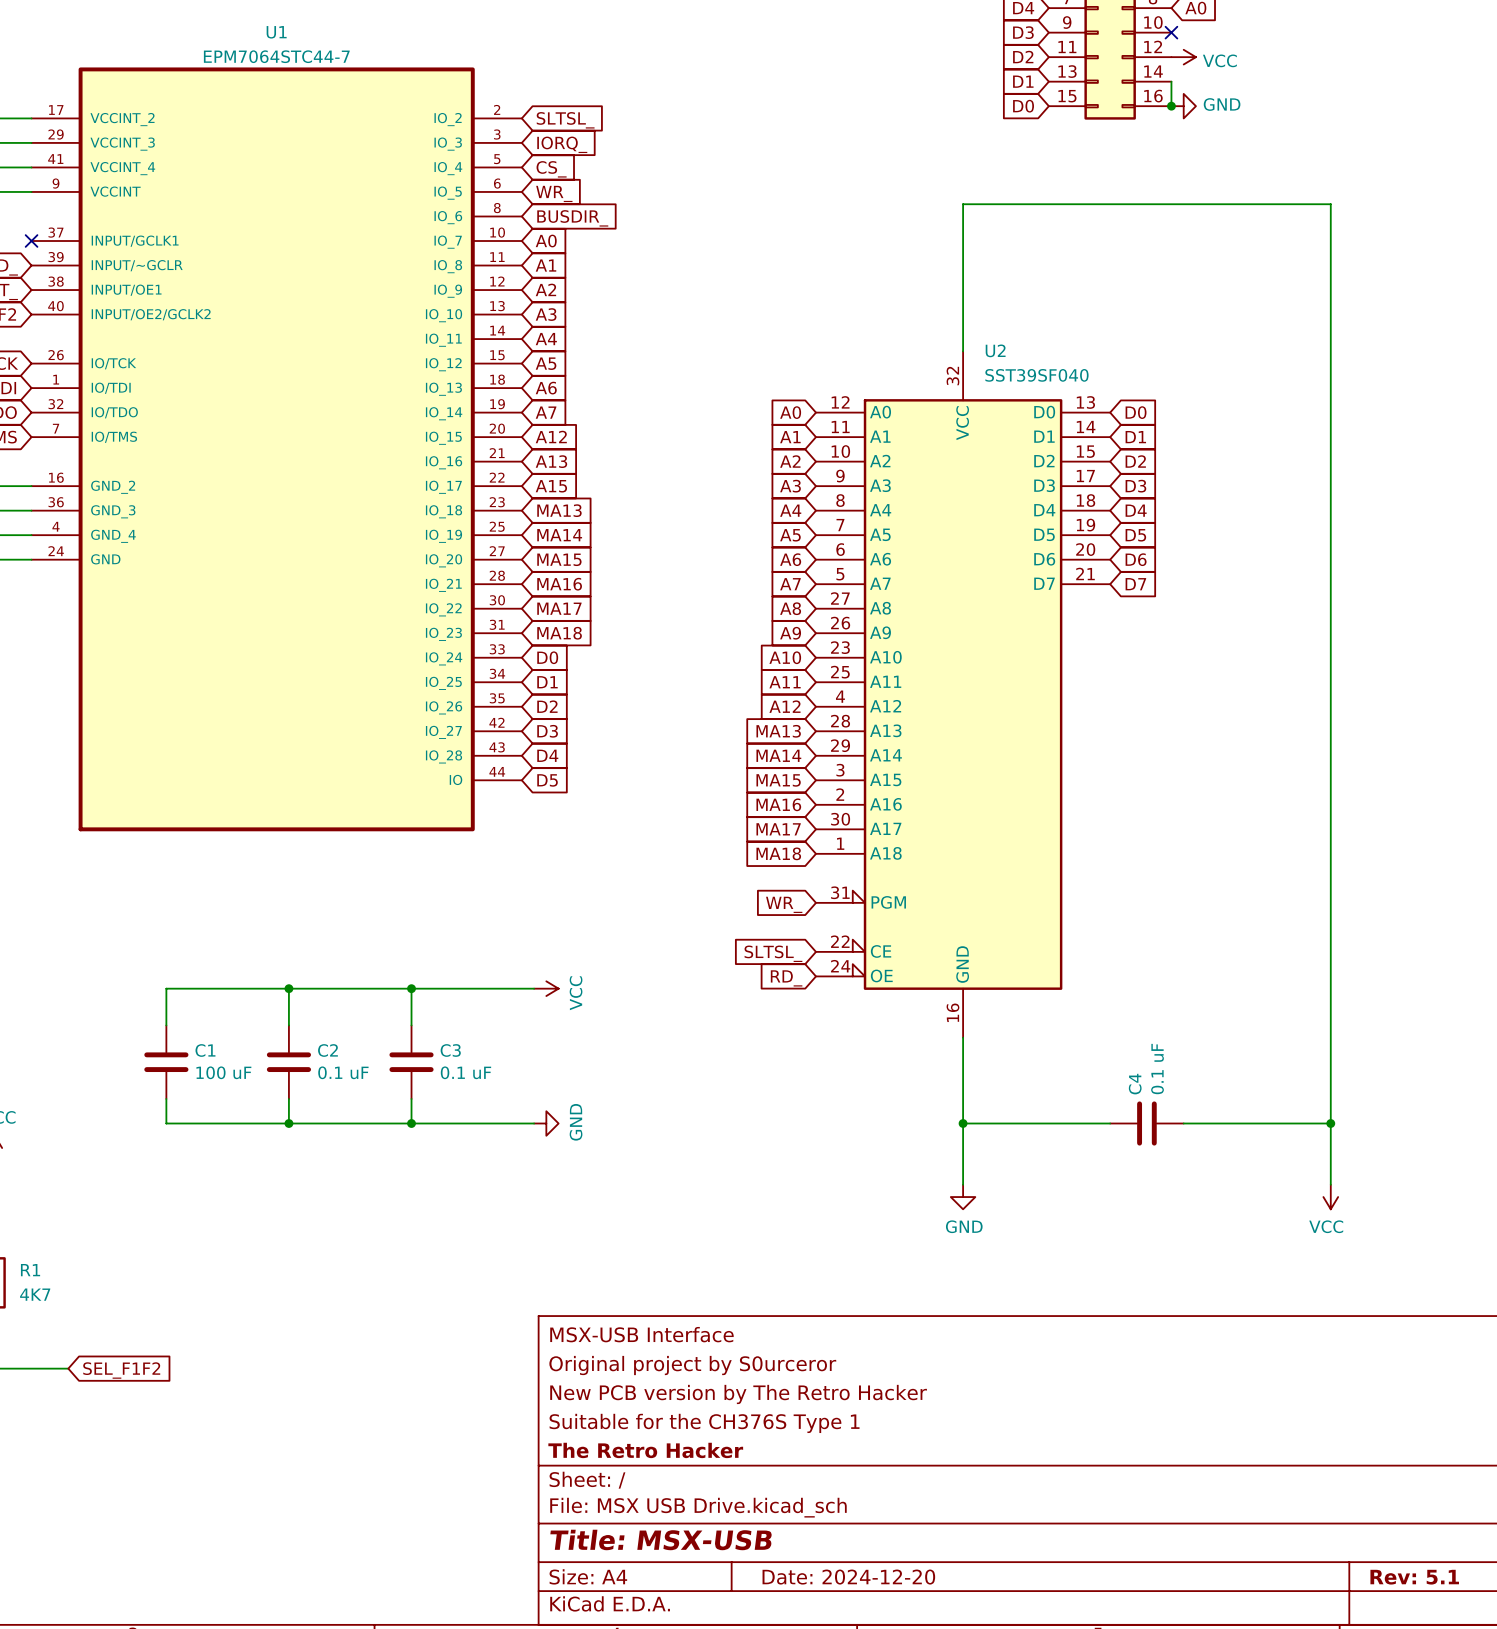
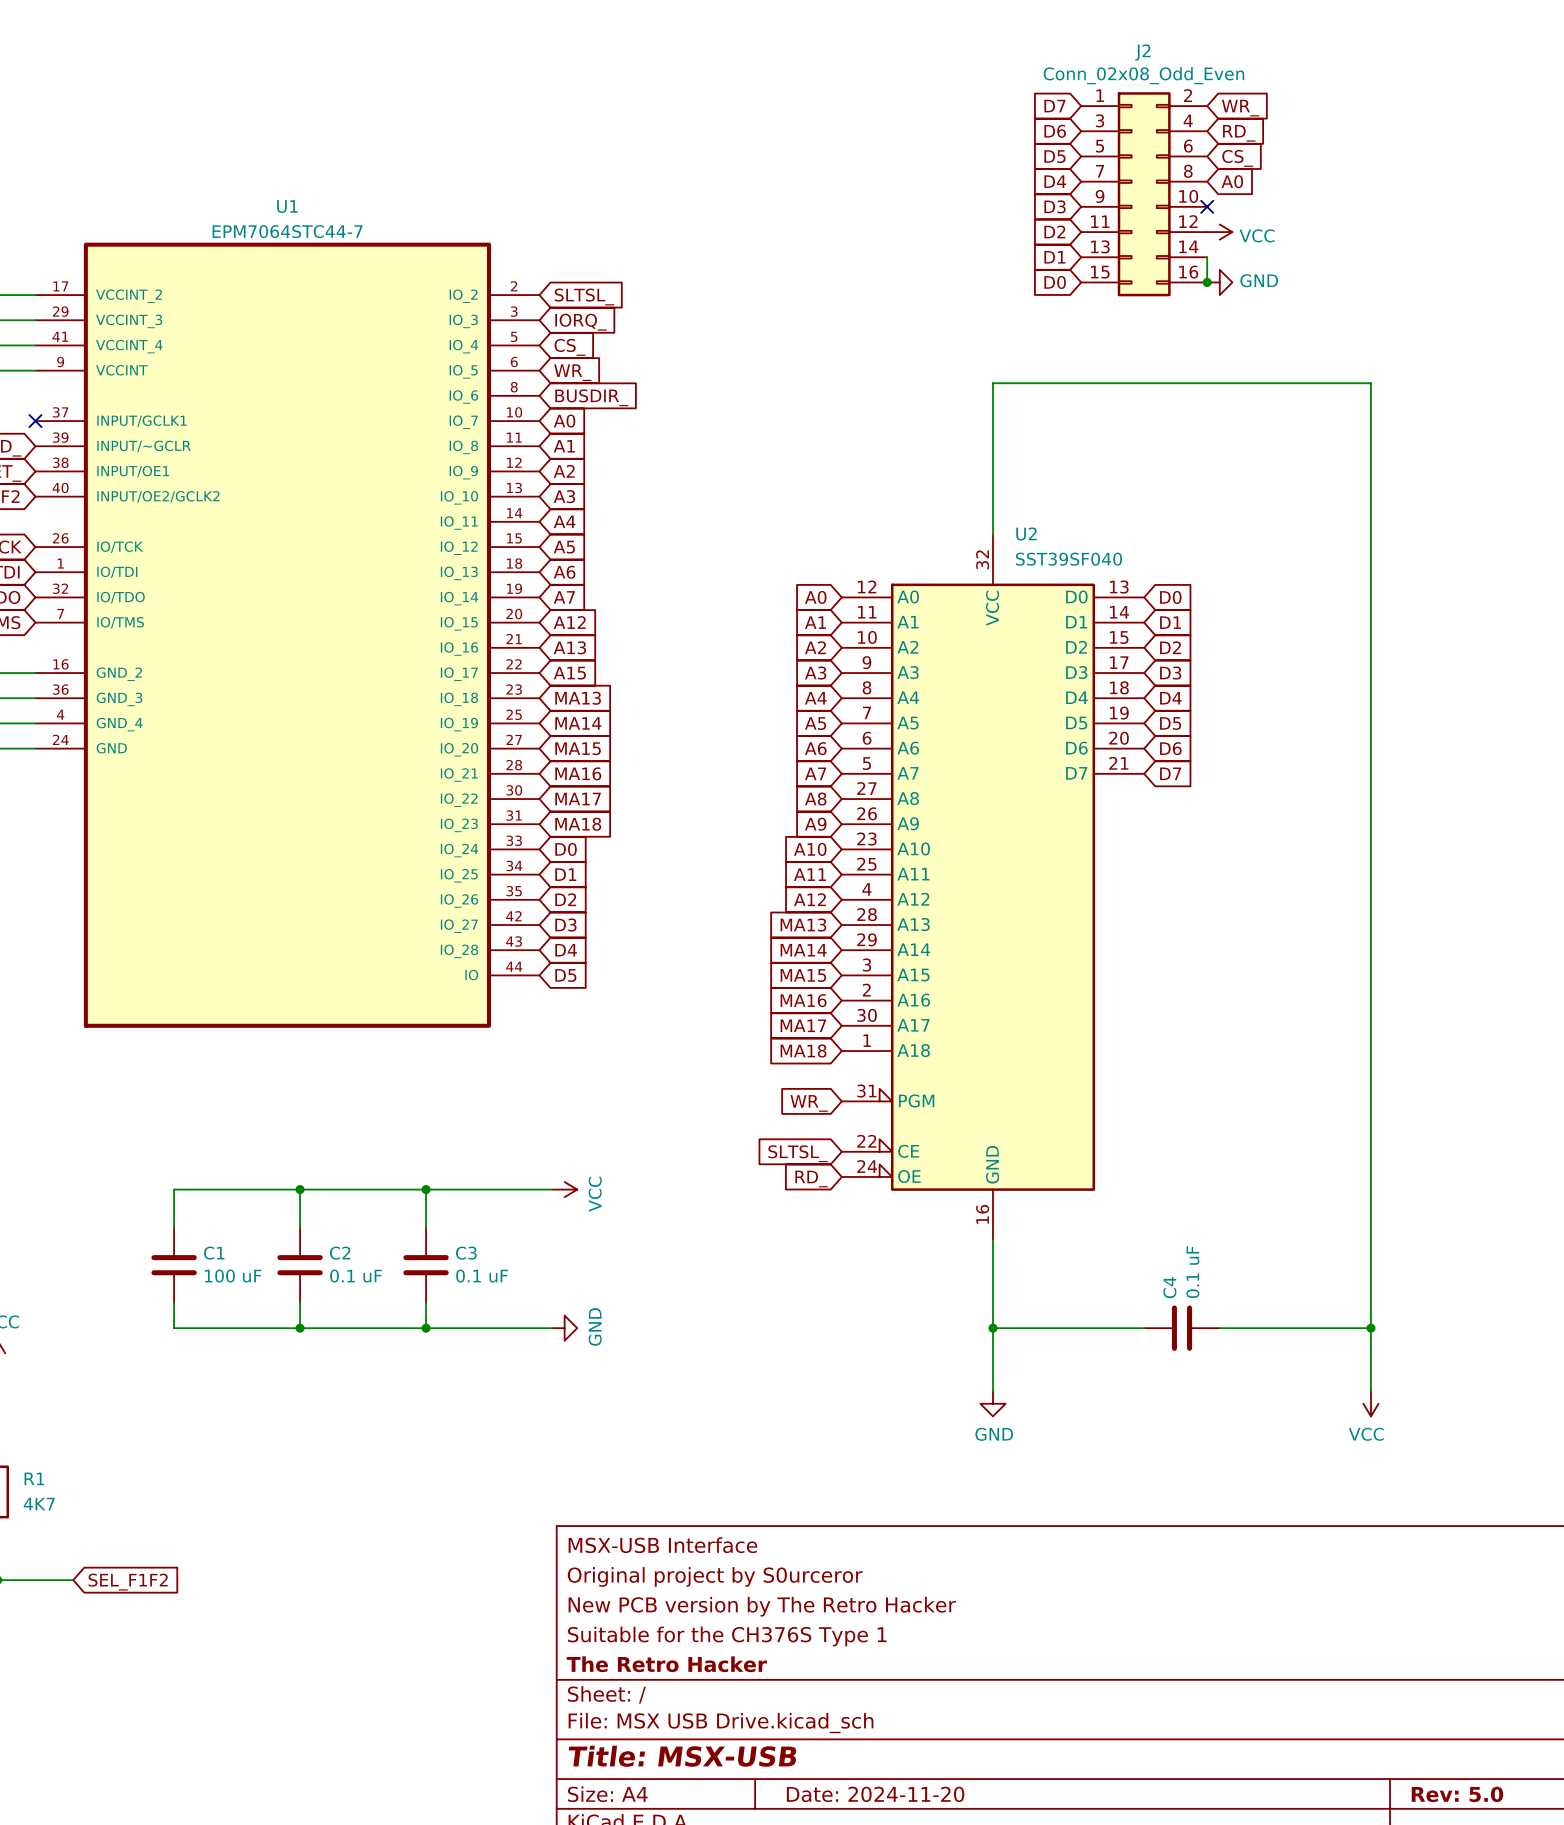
title block: Date: 2024-12-20 (848, 1577) -> Date: 2024-11-20 (875, 1794)
title block: Rev: 5.1 (1414, 1577) -> Rev: 5.0 (1457, 1794)

